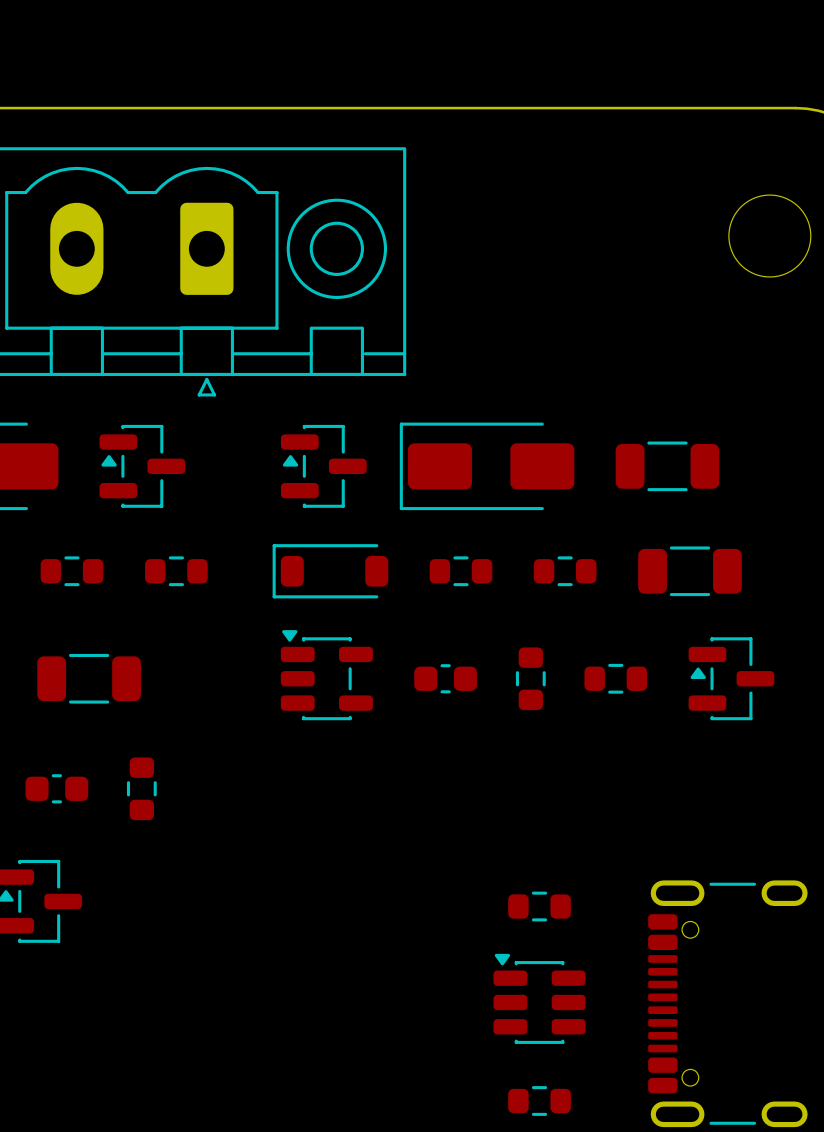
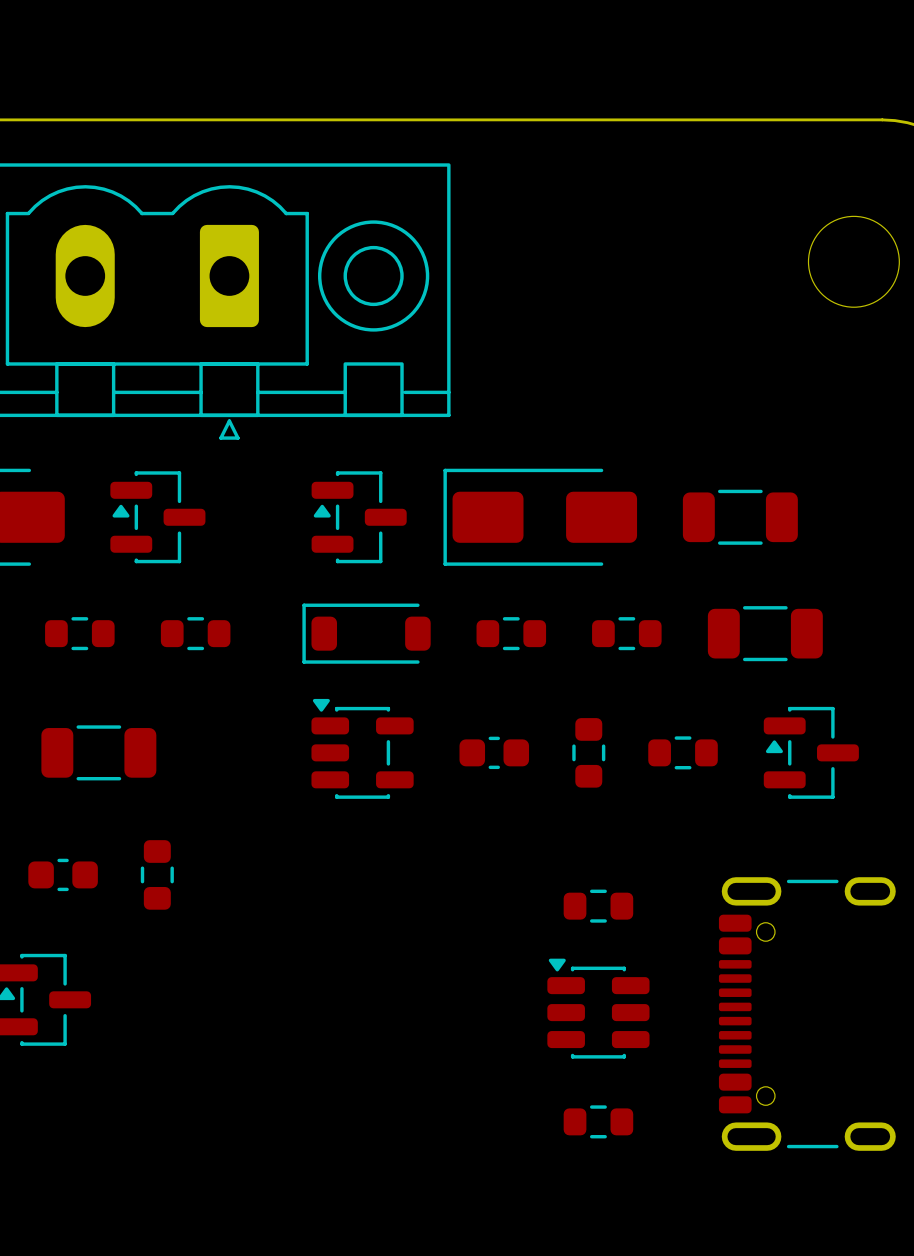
part: none -> (598, 906)
part footprint: [508, 891, 571, 922] -> [547, 958, 650, 1059]
part footprint: [493, 953, 586, 1044] -> [563, 1105, 634, 1139]
part position: (727, 1003) -> (807, 1014)
part: (539, 1101) -> none

